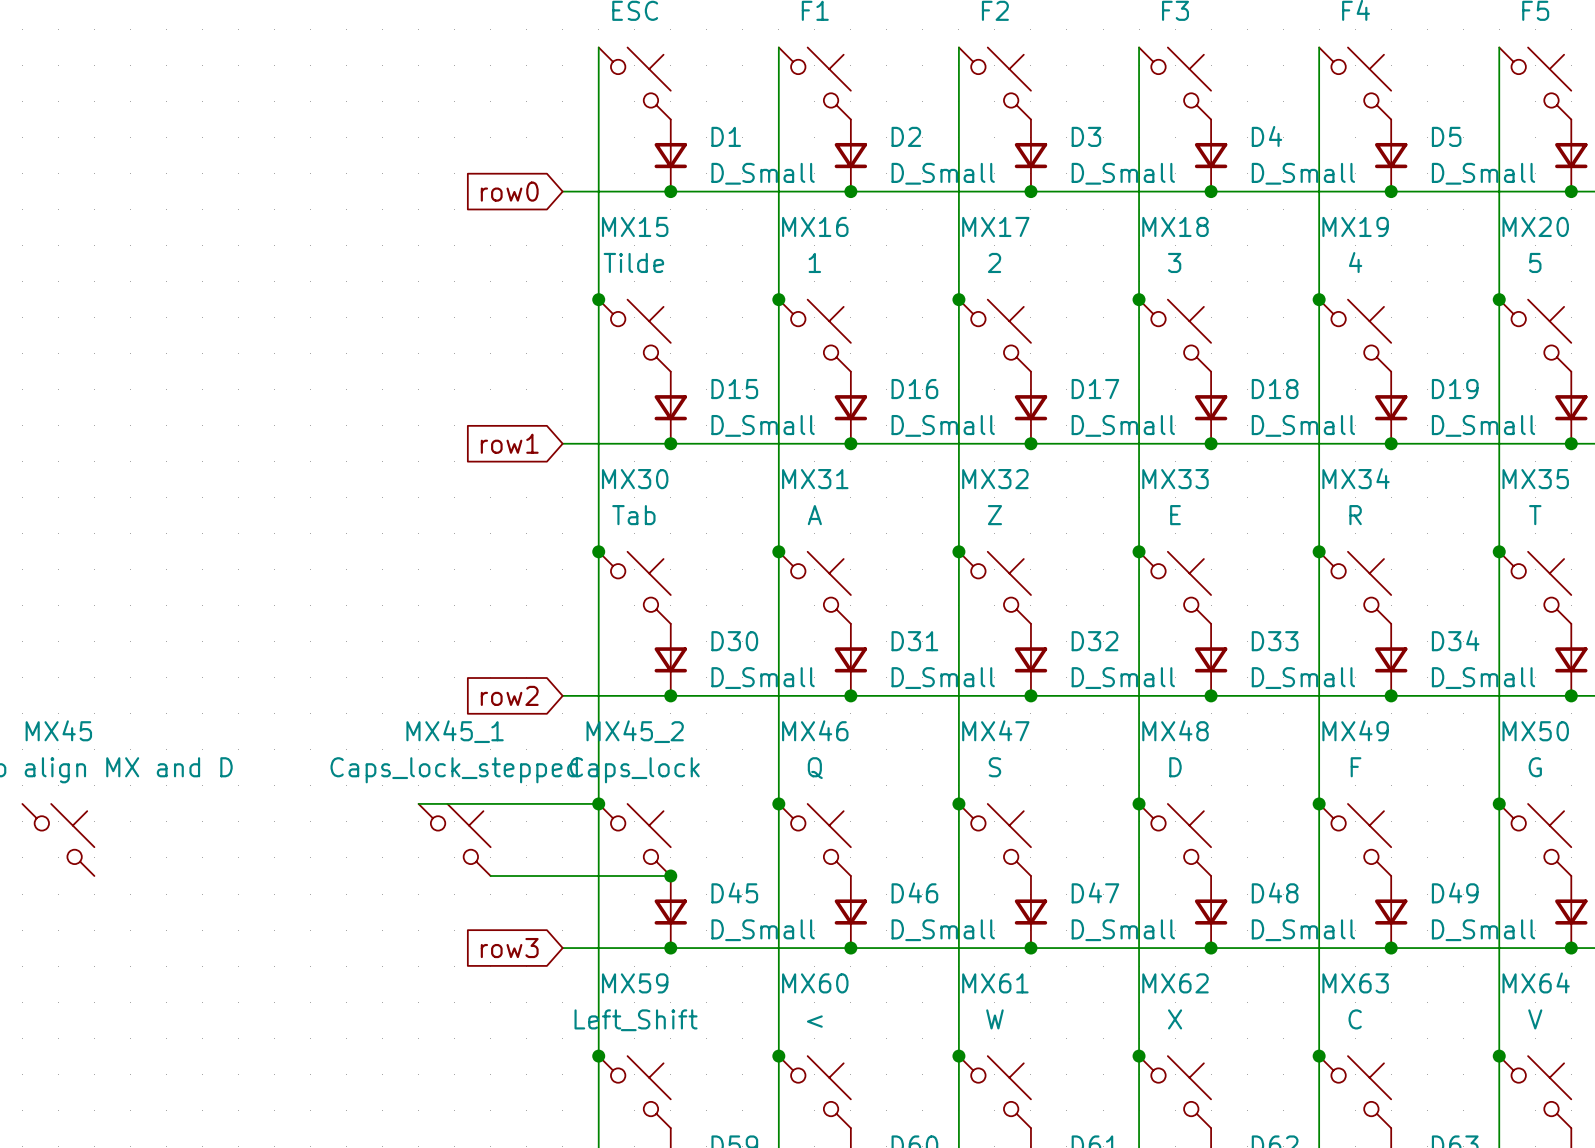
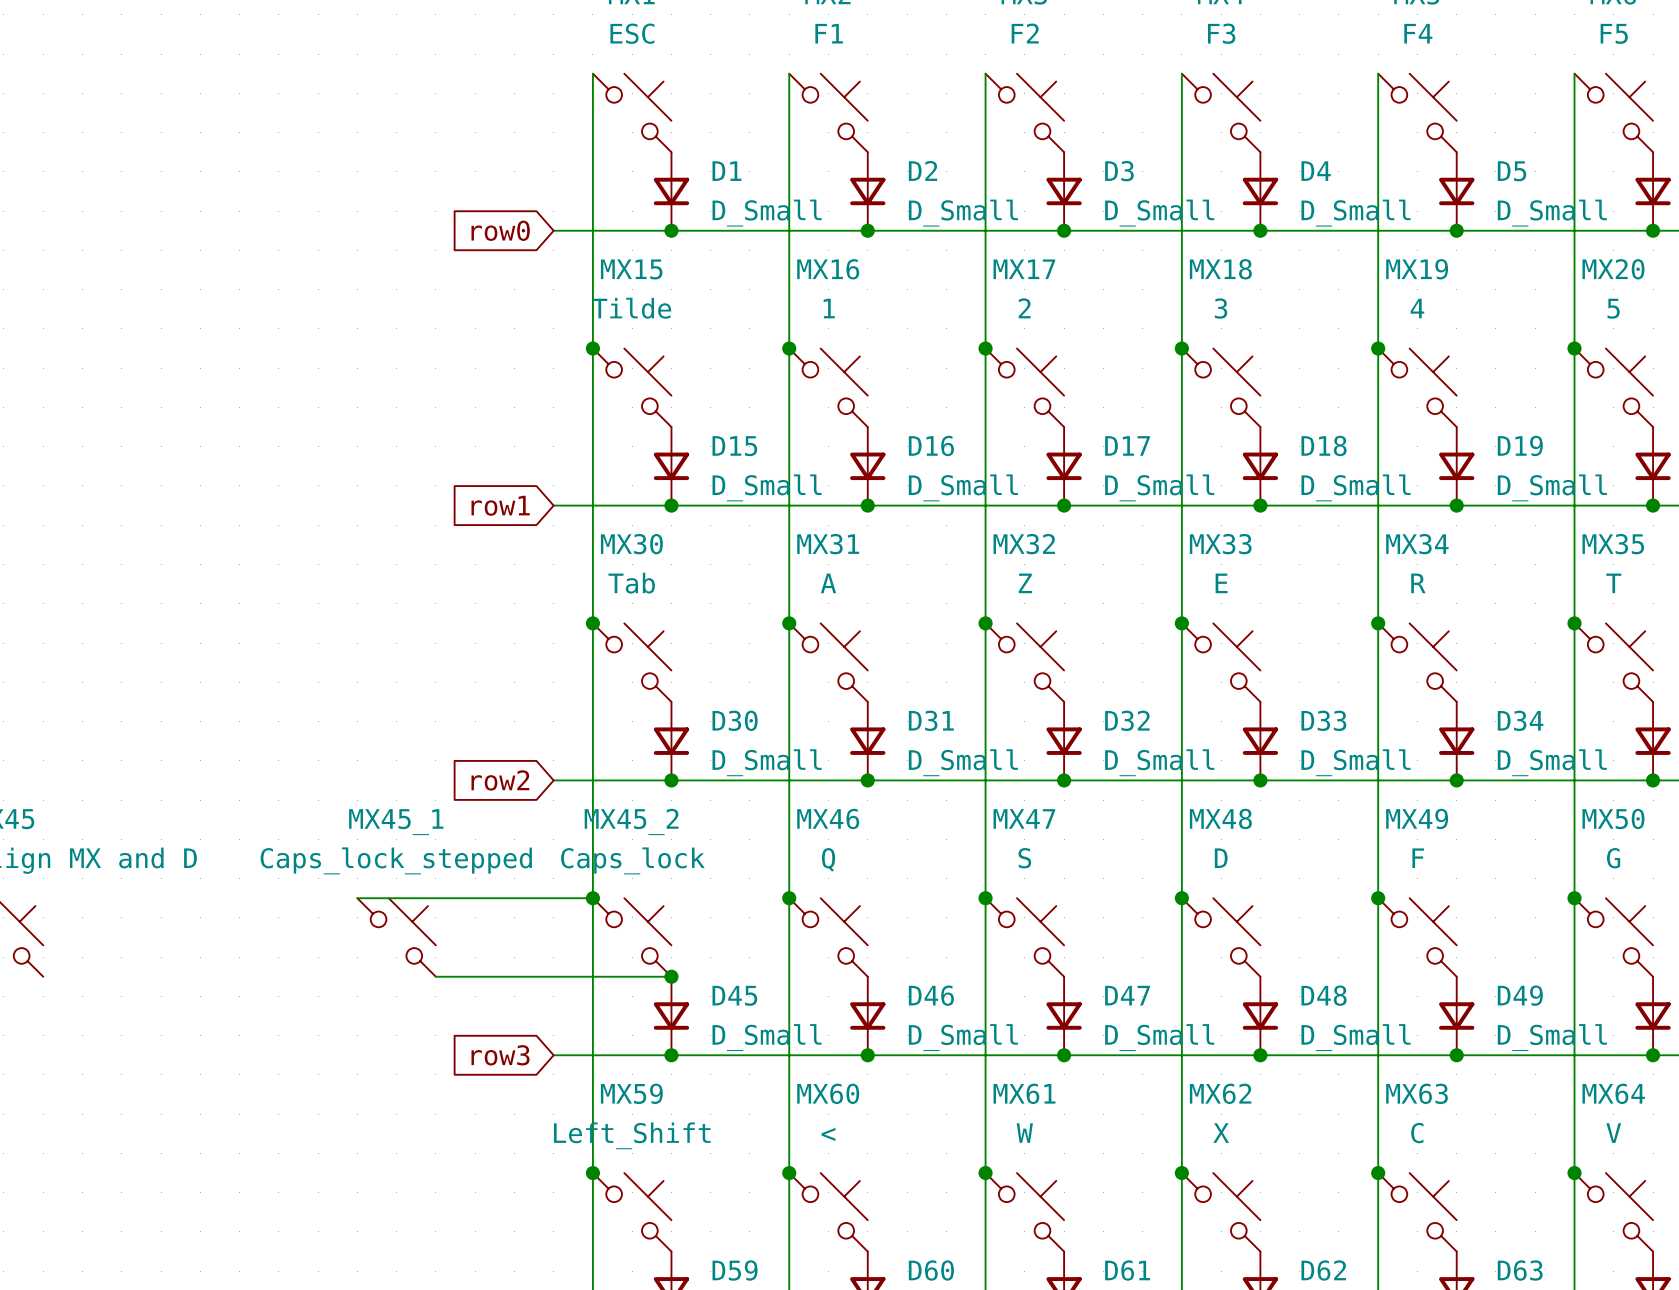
wire: none -> (357, 898) (396, 898)
MX45_1 position: (454, 839) -> (396, 937)
wire: none -> (435, 976) (475, 976)

